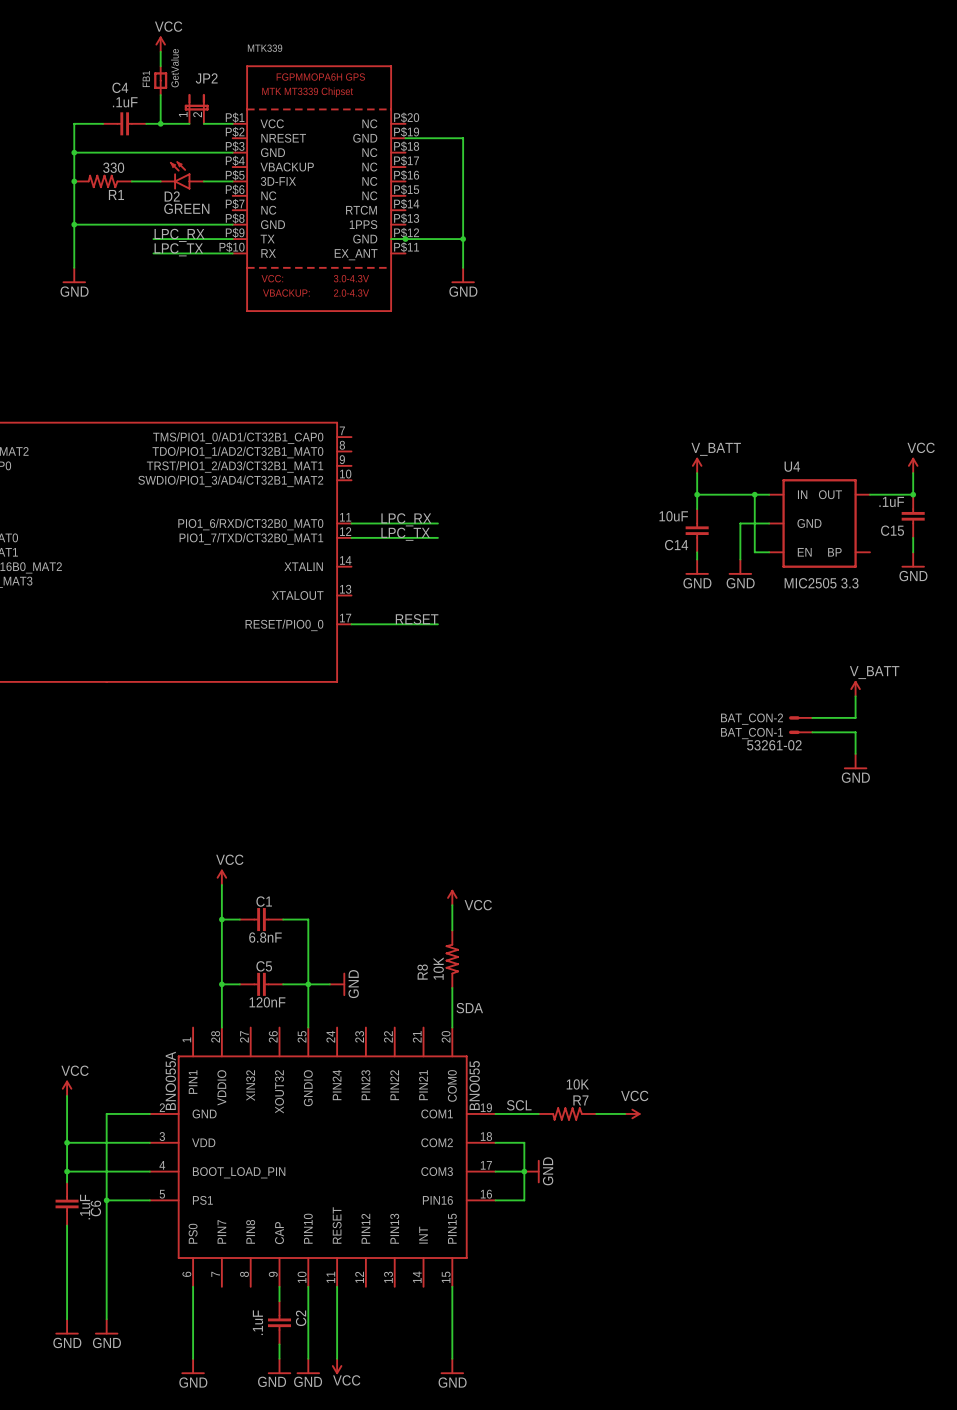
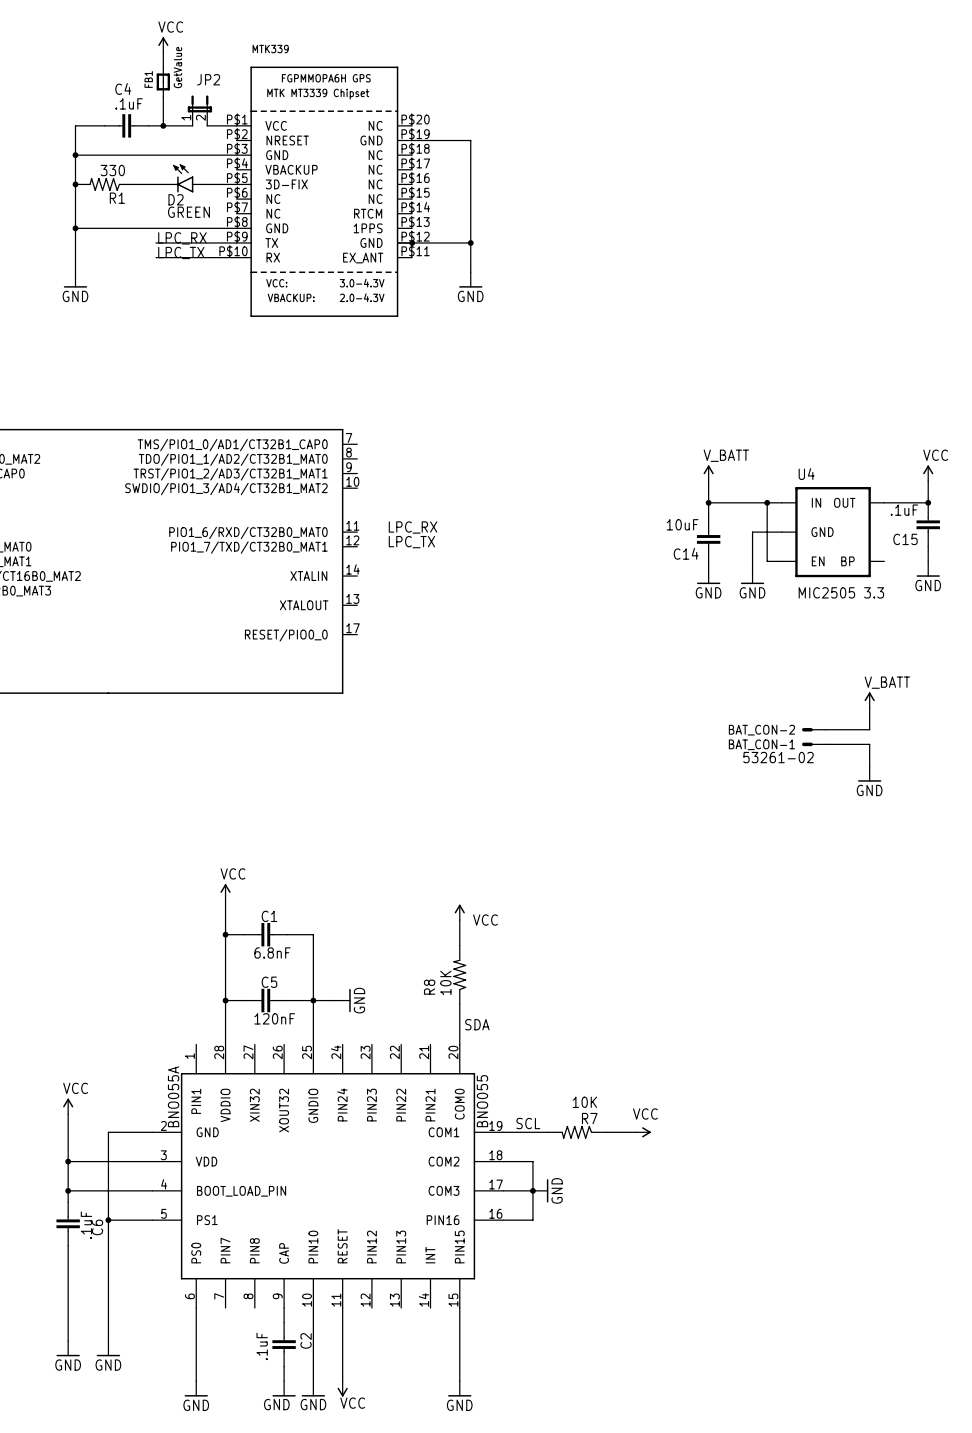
wire: (351, 523) (437, 523) -> none
wire: (351, 537) (437, 537) -> none
label: RESET (417, 619) -> none
wire: (351, 624) (437, 624) -> none

